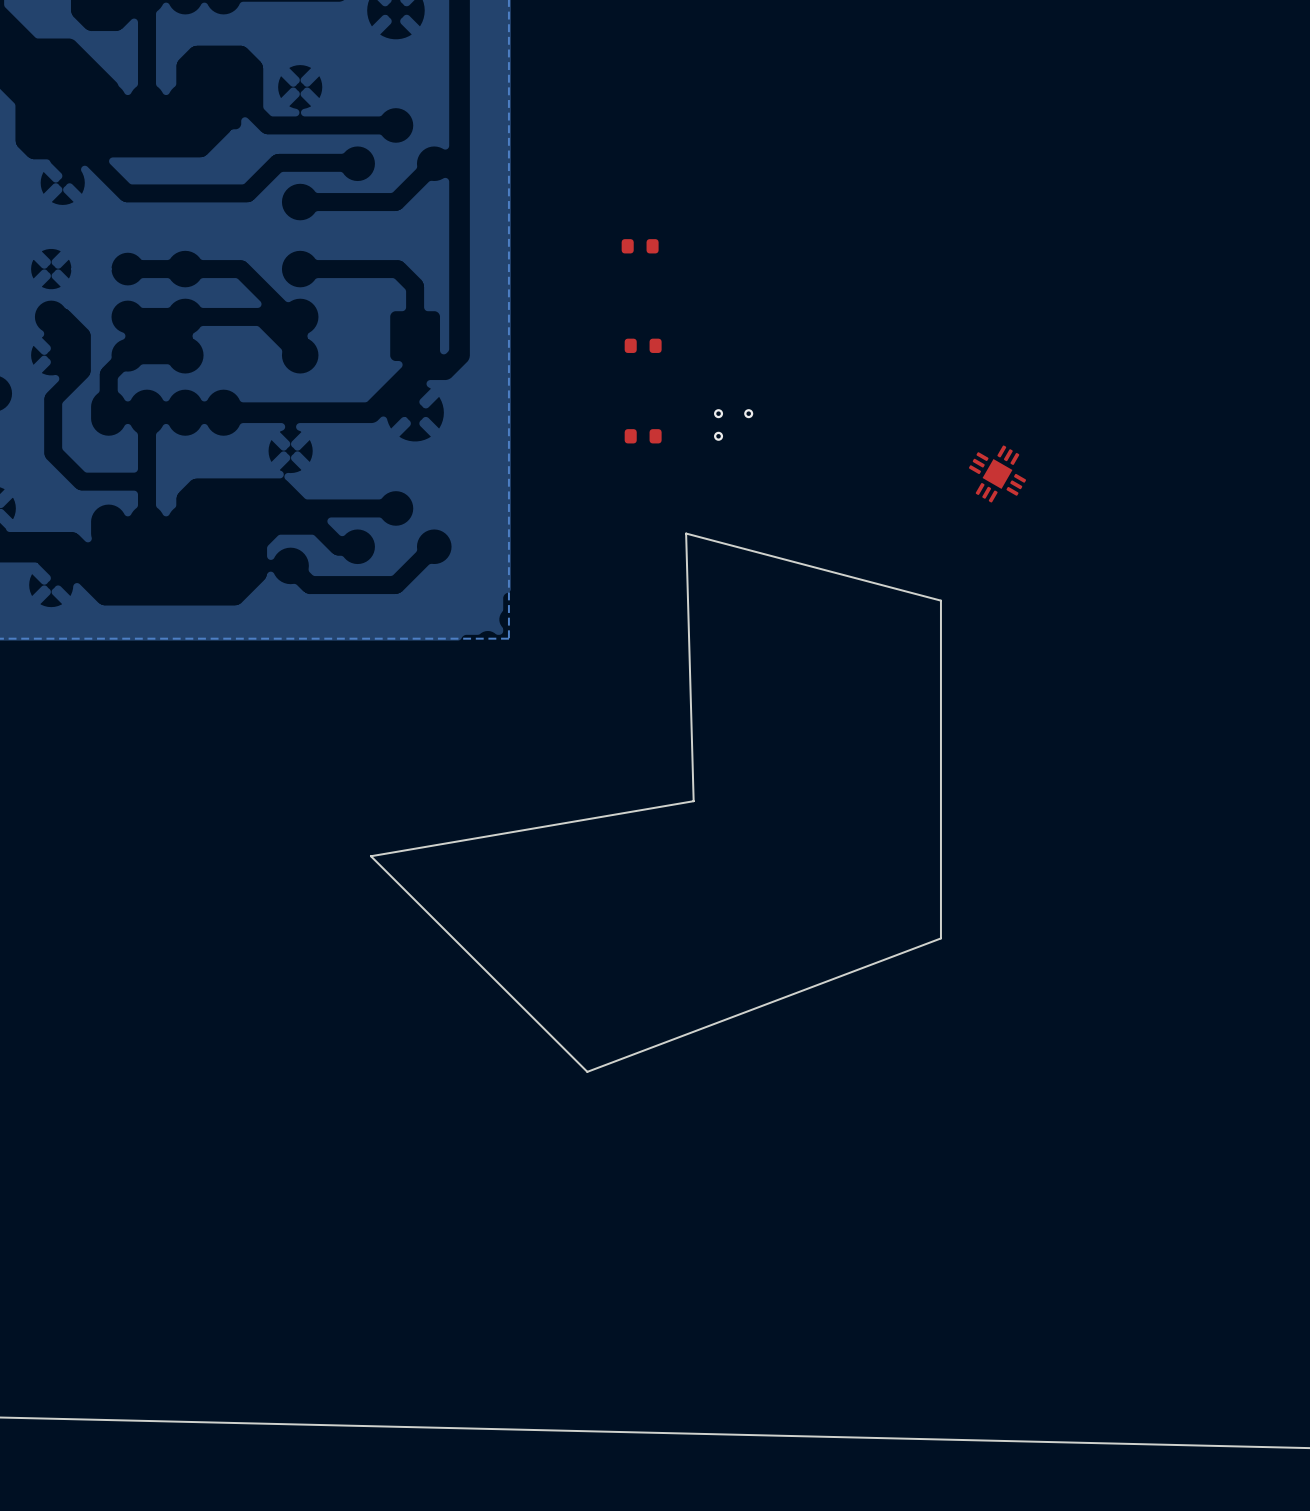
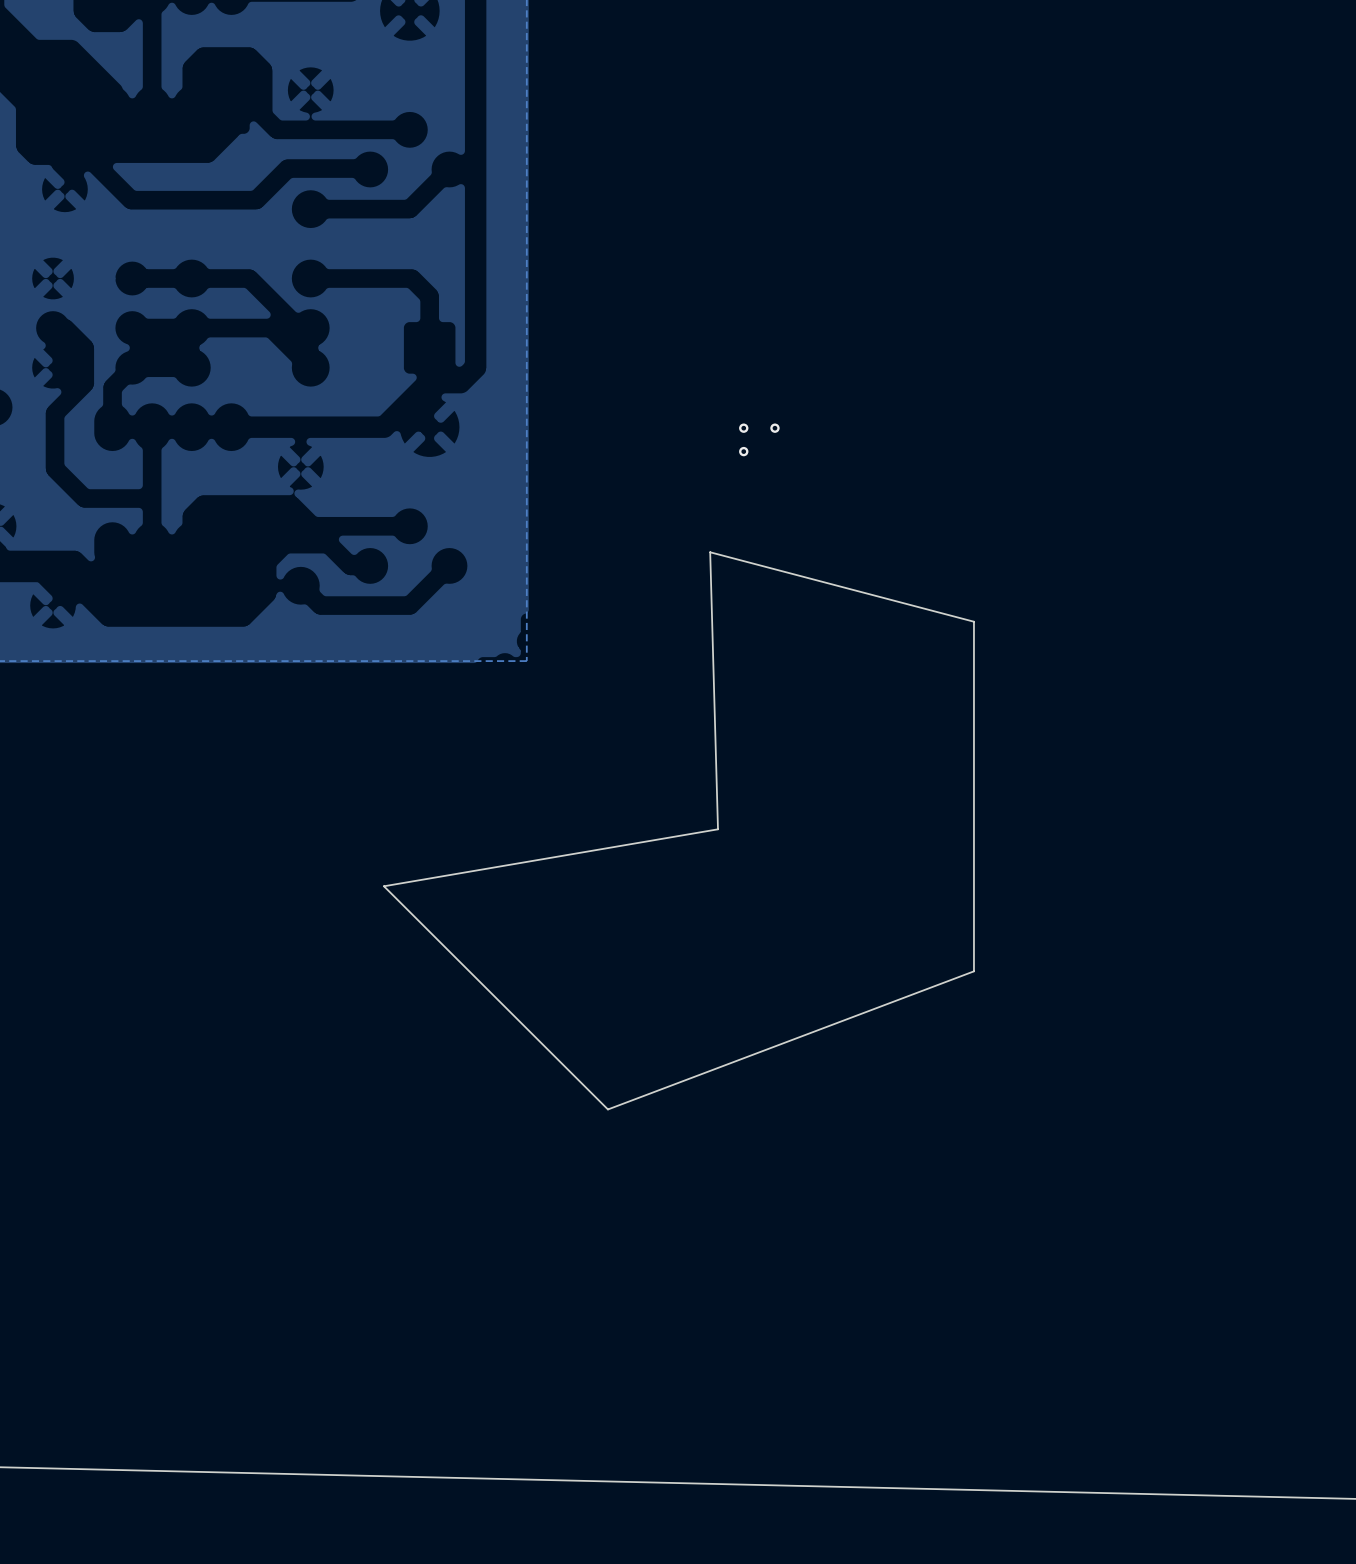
part: (640, 246) -> none
part: (643, 345) -> none
part: (643, 436) -> none
part: (997, 473) -> none

